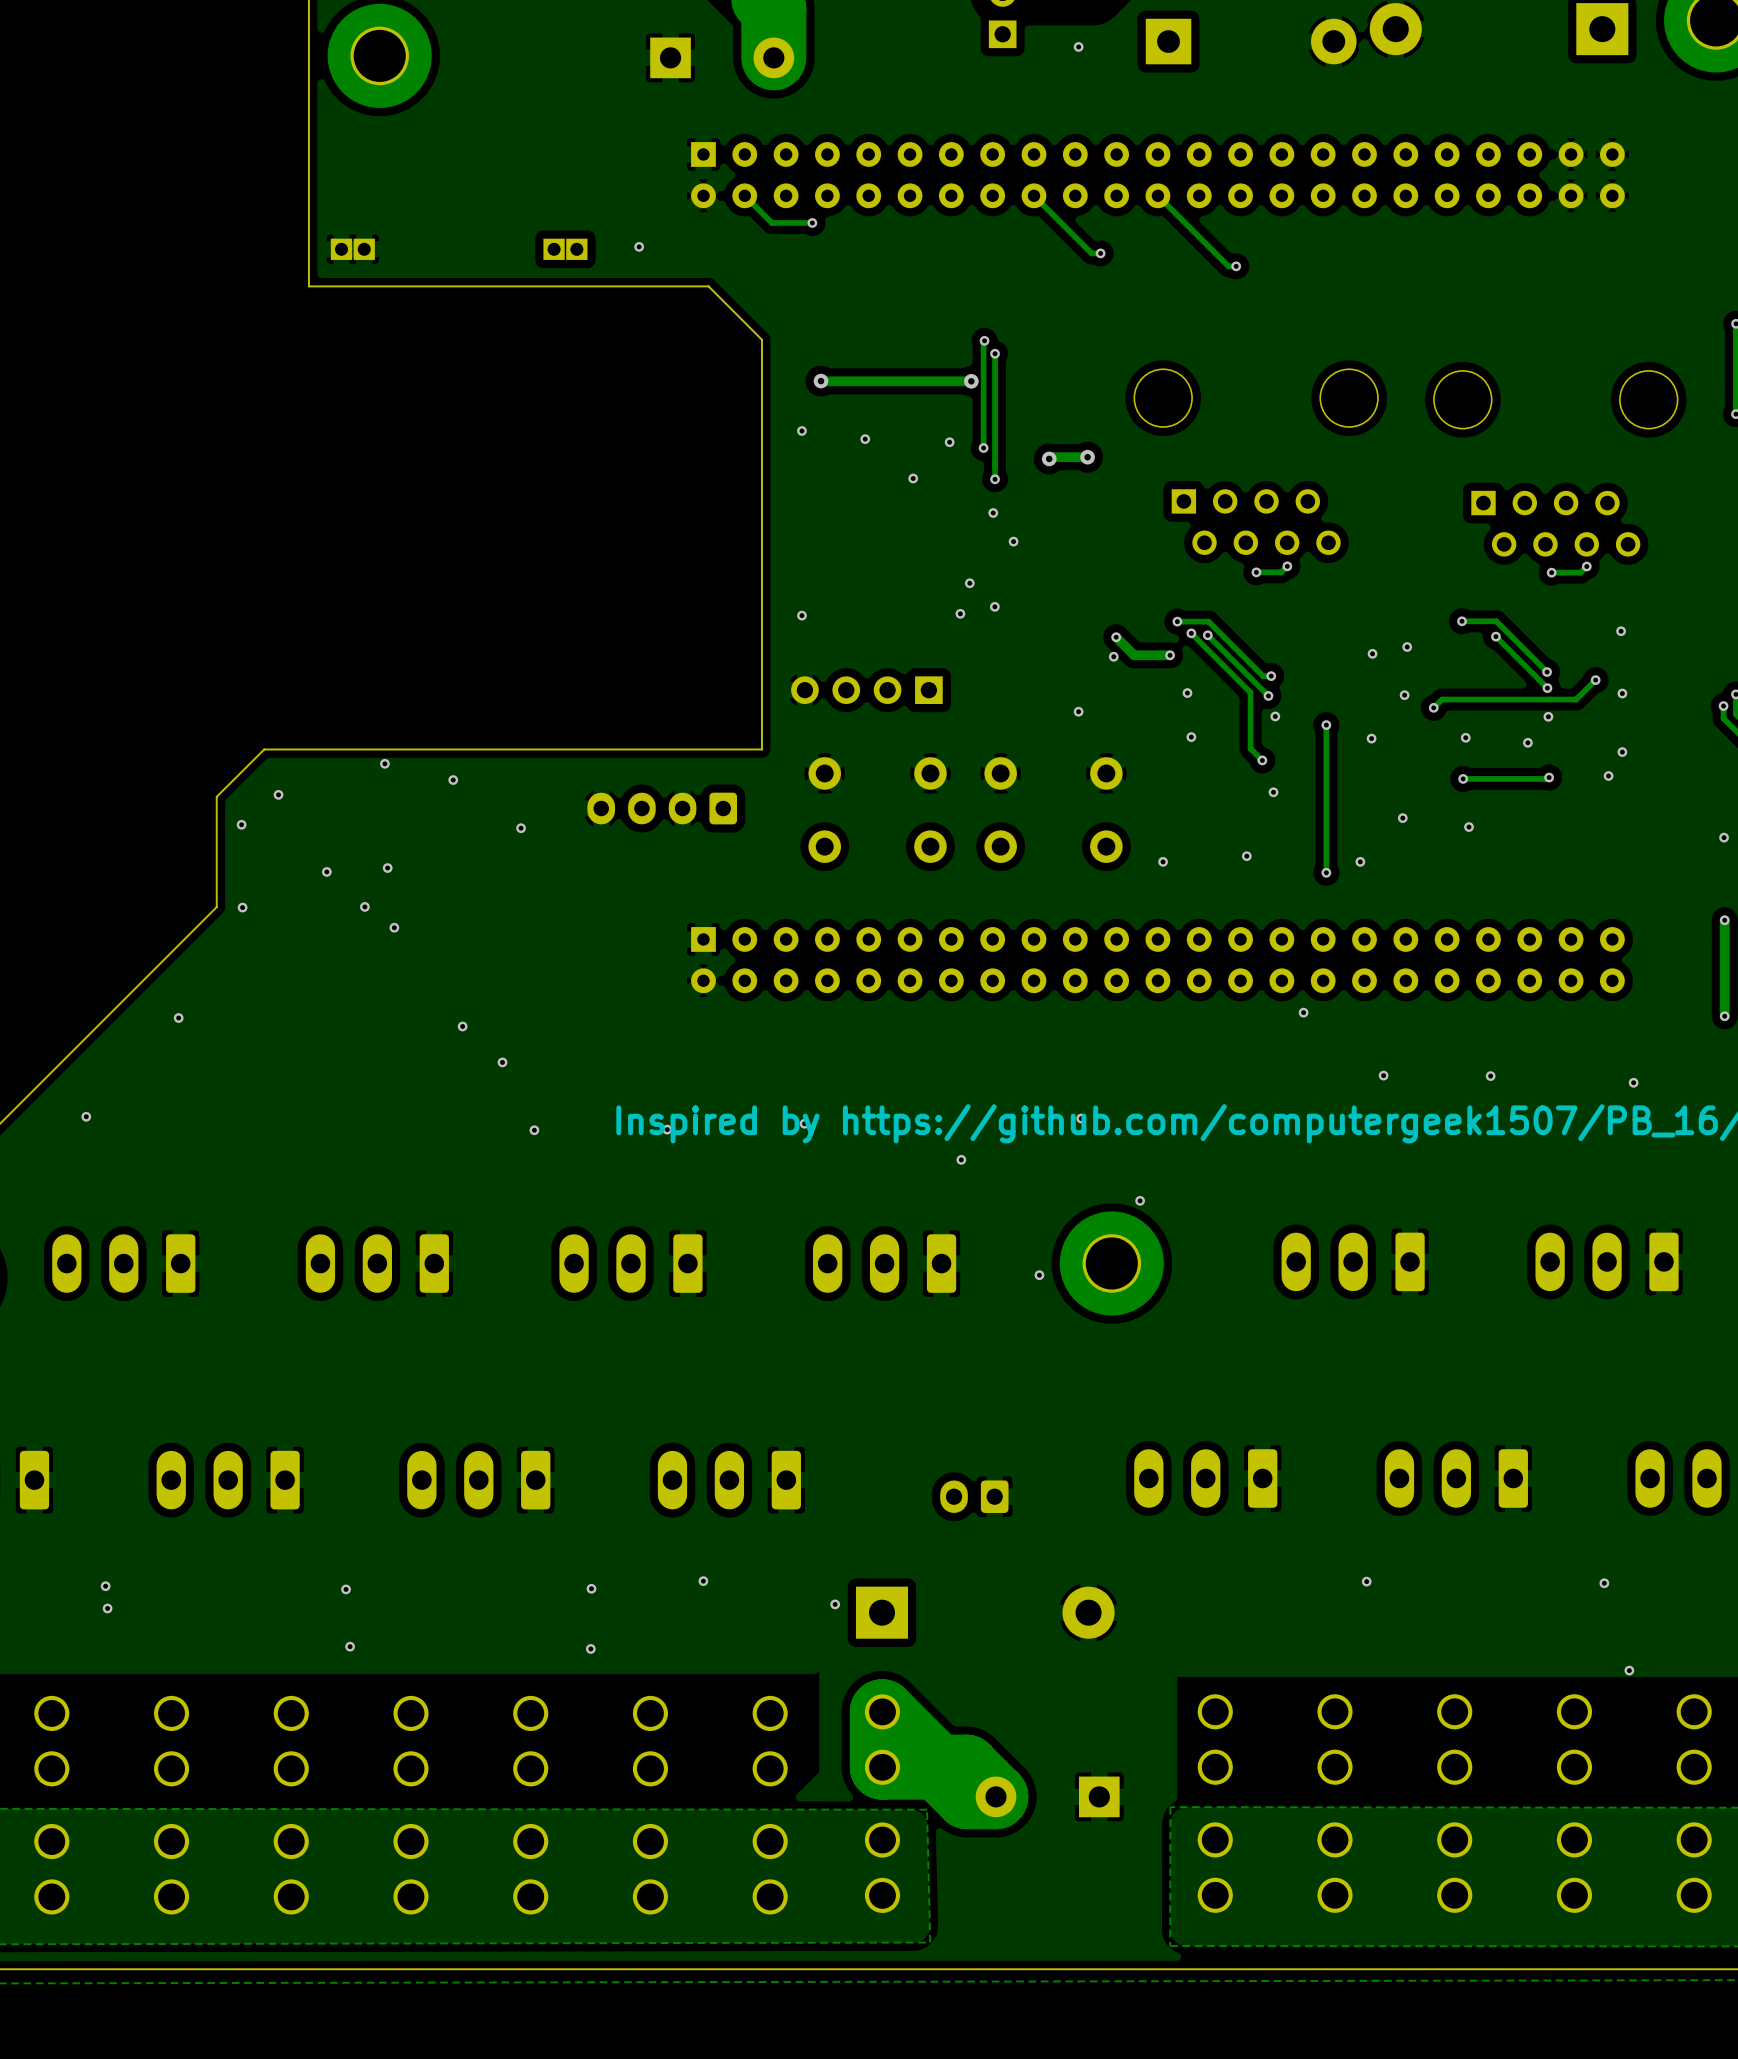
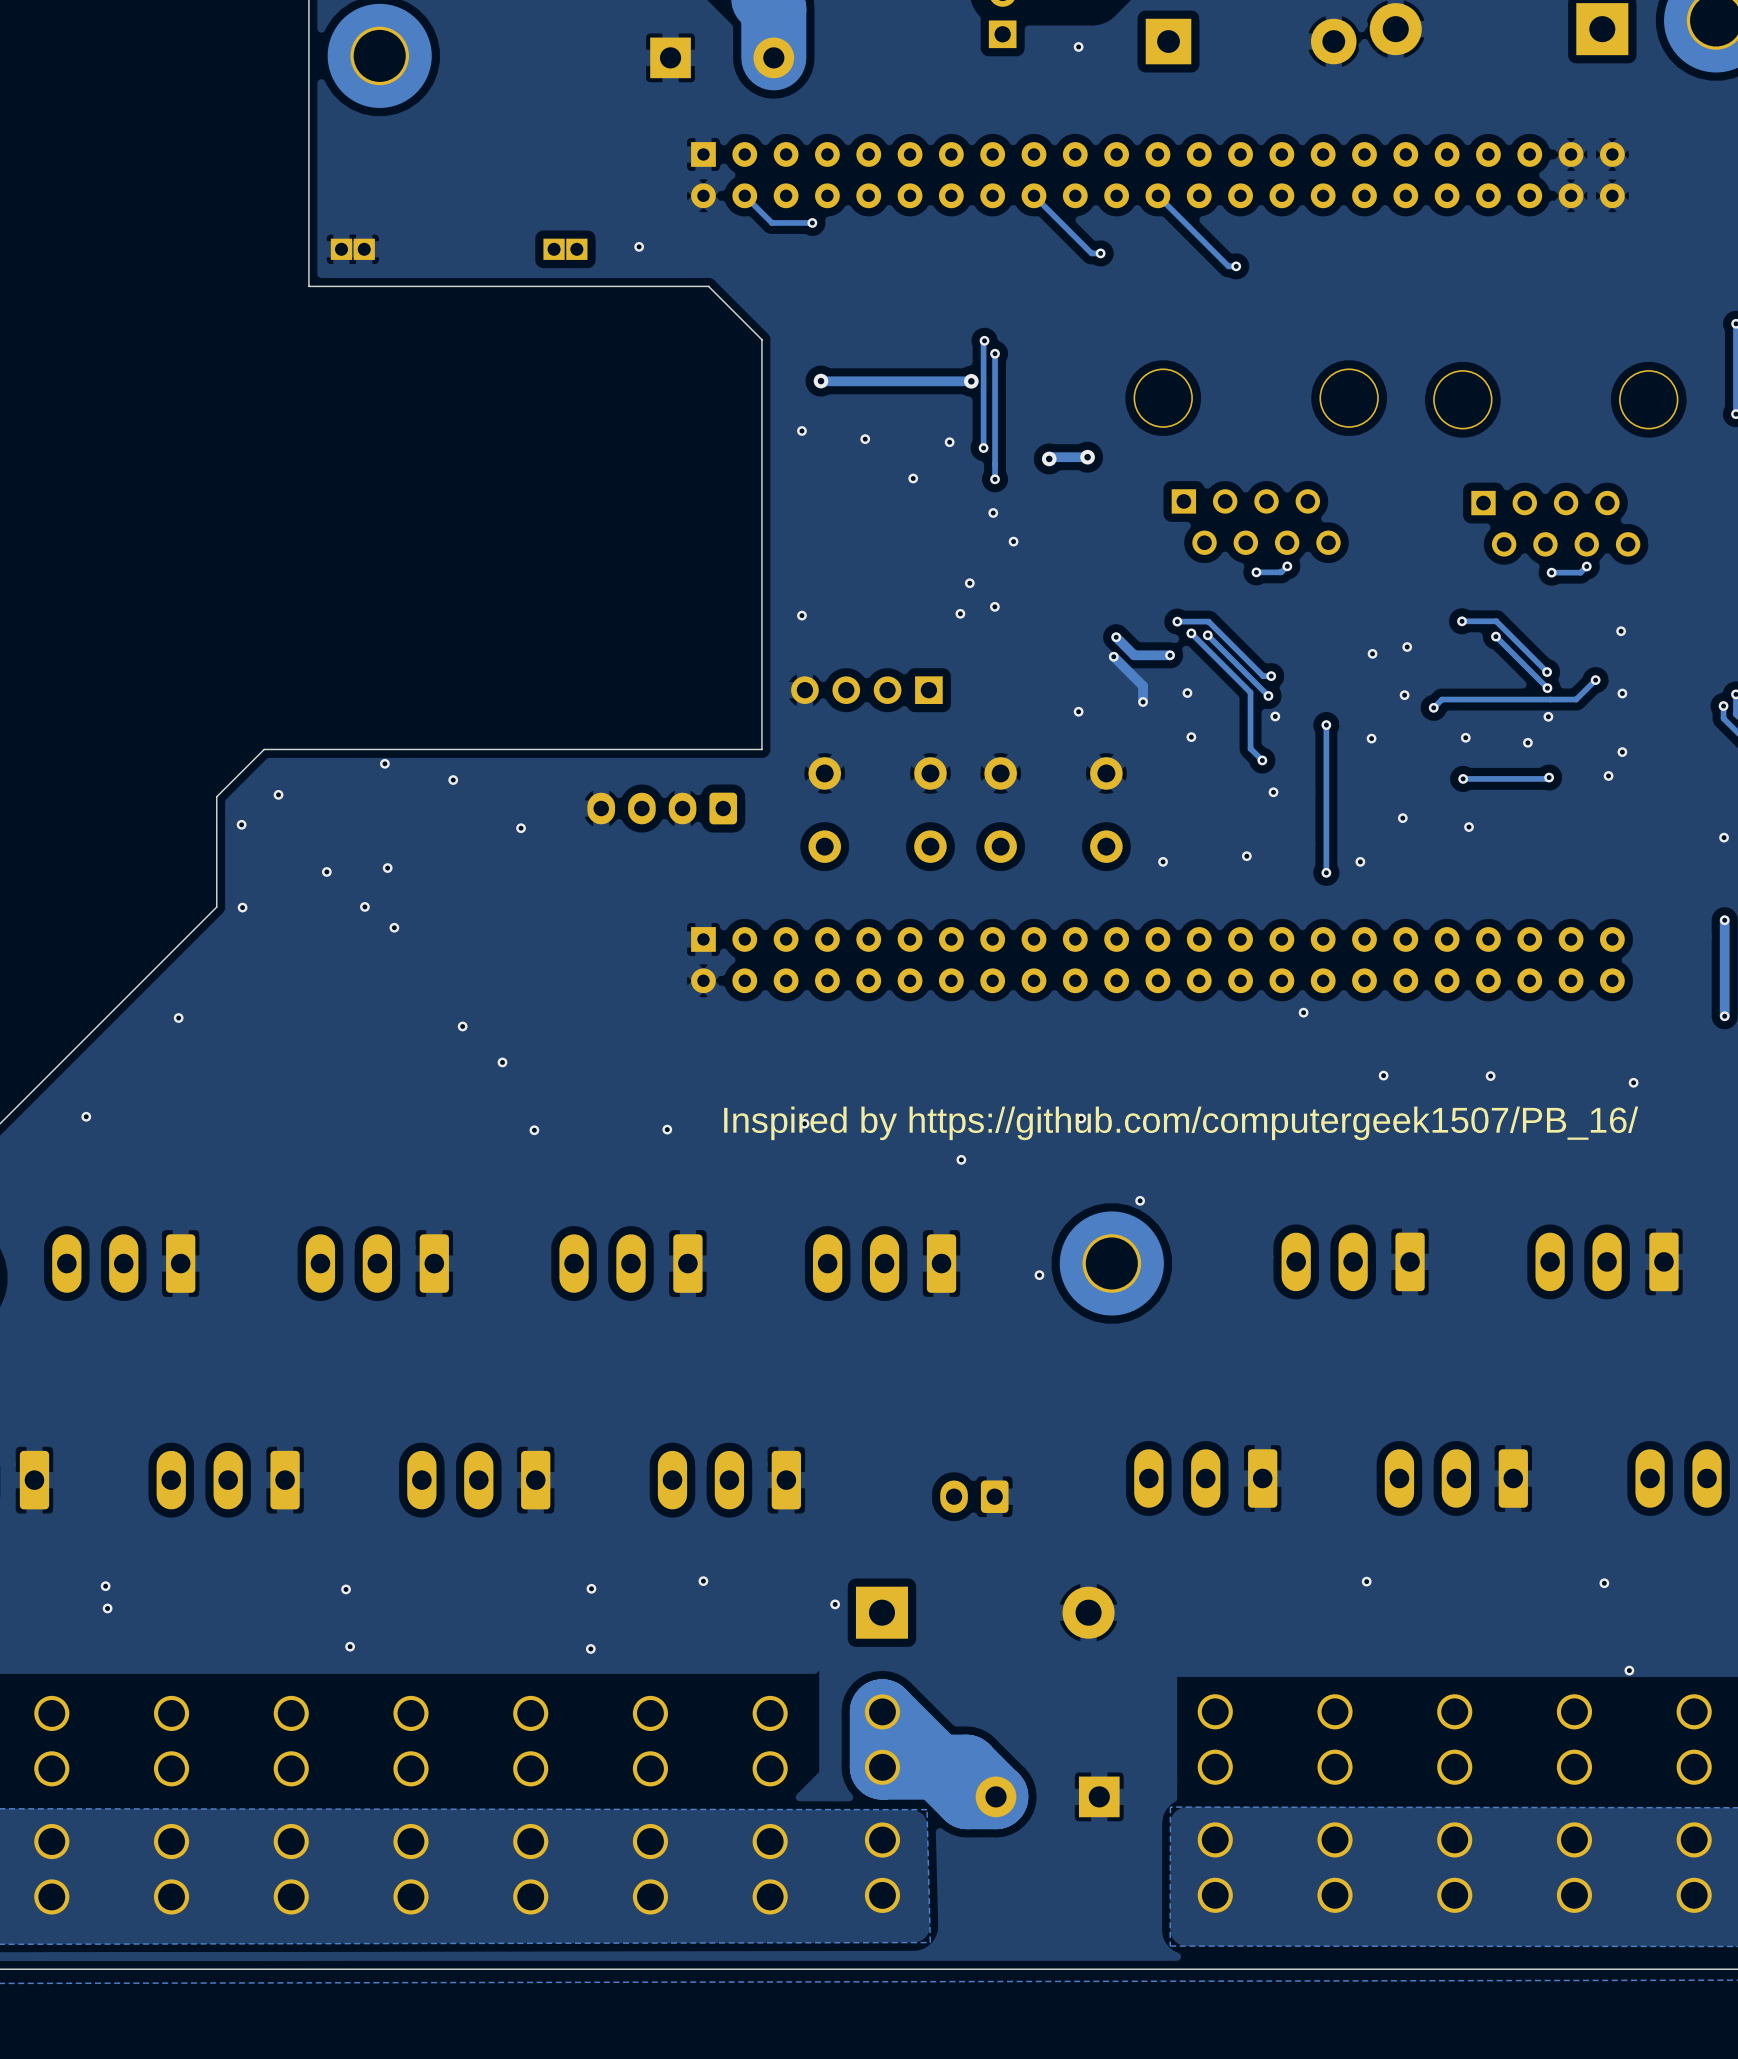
track: none -> (1113, 656) (1143, 686) (1143, 701)
via: none -> (1143, 701)

